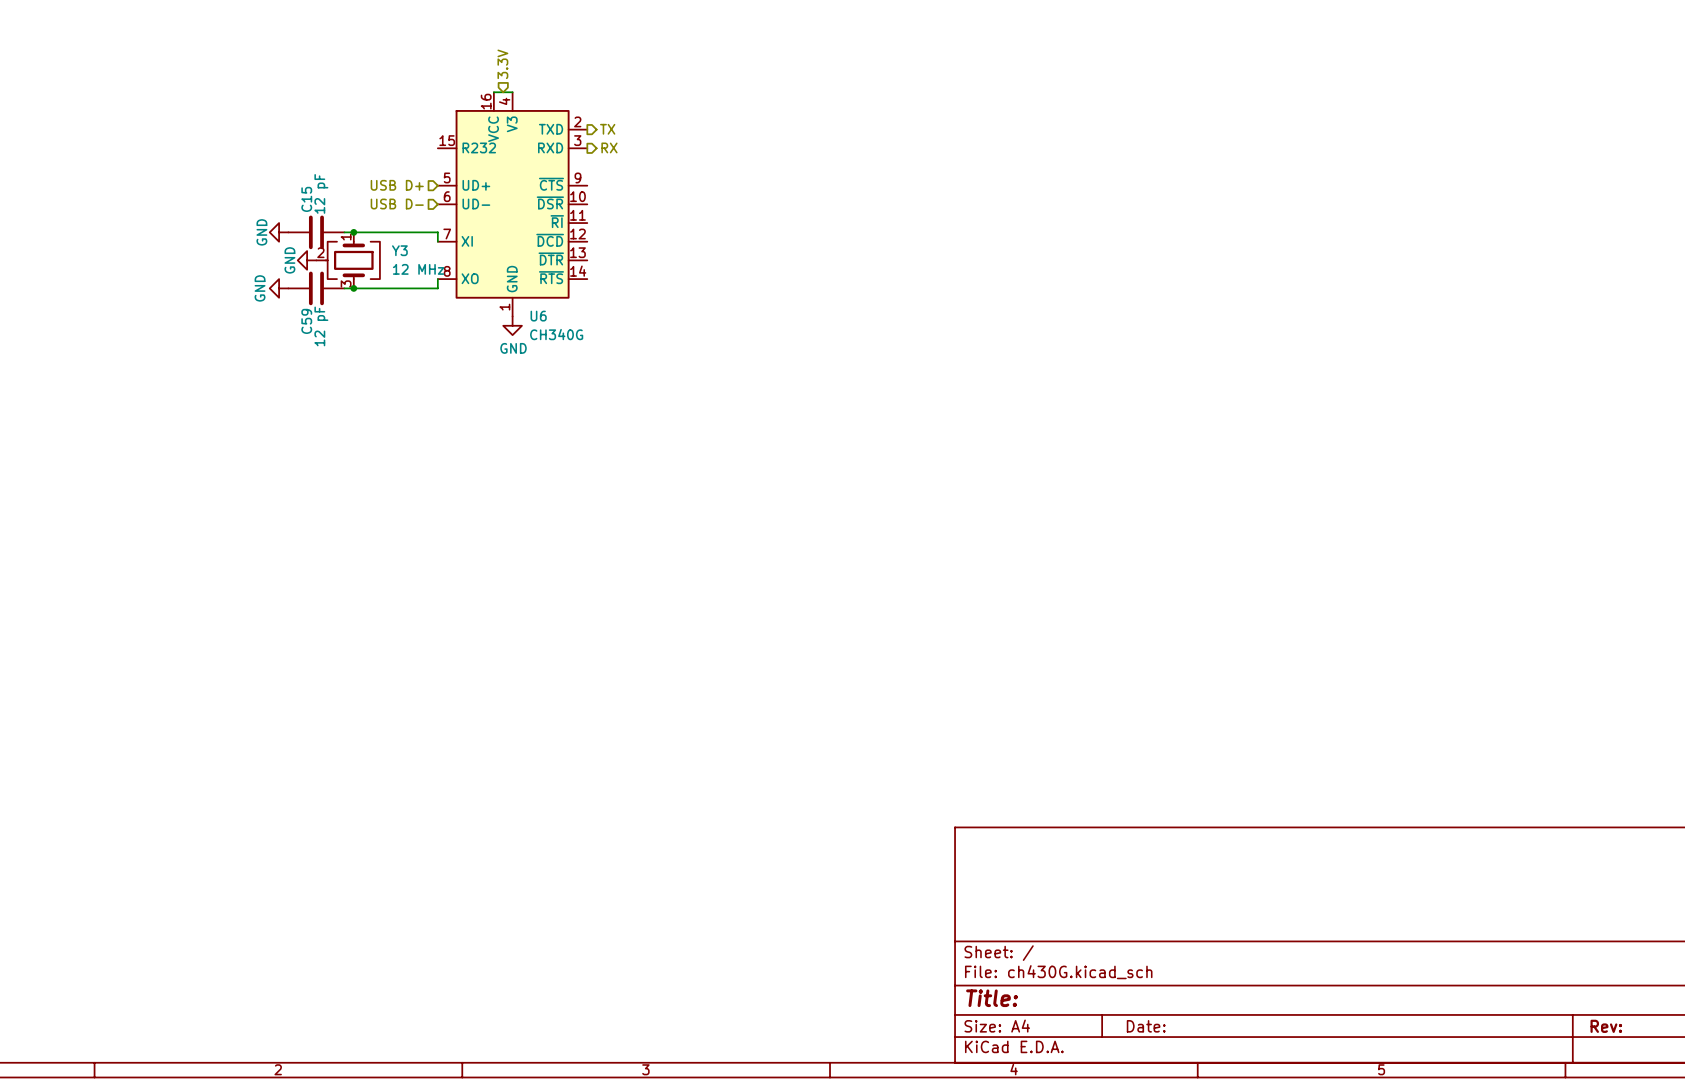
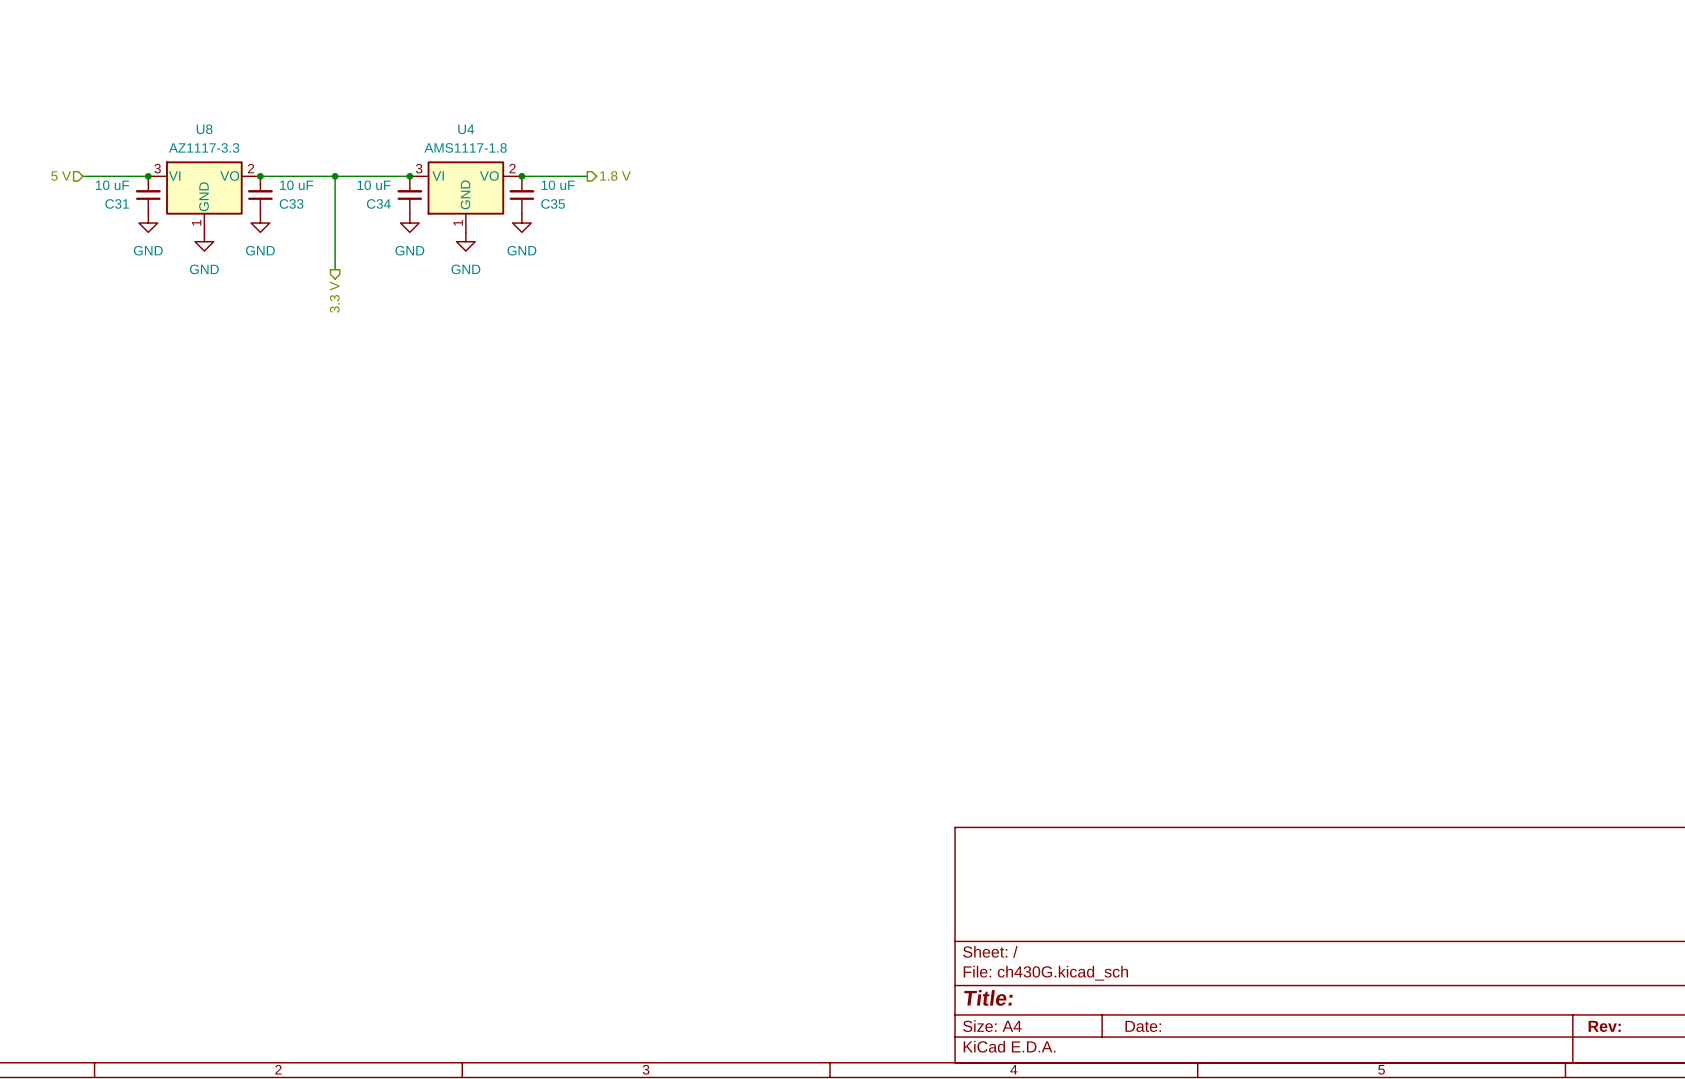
hierarchical label: 3.3V (502, 64) -> none
wire: (493, 92) (512, 92) -> none
hierarchical label: TX (607, 129) -> none
hierarchical label: RX (609, 147) -> none
hierarchical label: none -> 5 V (61, 176)
hierarchical label: none -> 1.8 V (615, 175)
wire: none -> (82, 176) (148, 176)
junction: none -> (148, 176)
wire: none -> (260, 176) (409, 176)
junction: none -> (260, 176)
wire: none -> (335, 176) (335, 269)
junction: none -> (335, 176)
junction: none -> (409, 176)
junction: none -> (521, 176)
hierarchical label: USB D+ (397, 185) -> none
C31: none -> 10 uF (148, 195)
C33: none -> 10 uF (260, 195)
C34: none -> 10 uF (409, 195)
C35: none -> 10 uF (521, 195)
U8: none -> AZ1117-3.3 (204, 196)
U4: none -> AMS1117-1.8 (465, 196)
hierarchical label: USB D- (397, 204) -> none
U6: CH340G (512, 204) -> none
power symbol: none -> GND (148, 223)
power symbol: none -> GND (409, 223)
power symbol: none -> GND (521, 223)
power symbol rotation: 0° (279, 232) -> 90° counterclockwise (260, 223)
power symbol position: GND (279, 232) -> GND (260, 223)
C15: 12 pF (316, 232) -> none
wire: (344, 232) (437, 232) (437, 241) -> none
junction: (353, 232) -> none
power symbol: none -> GND (204, 241)
power symbol: none -> GND (465, 241)
power symbol: GND (307, 260) -> none
Y3: 12 MHz (348, 260) -> none
wire: (437, 279) (437, 288) (344, 288) -> none
power symbol: GND (279, 288) -> none
C59: 12 pF (316, 288) -> none
junction: (353, 288) -> none
hierarchical label: none -> 3.3 V (334, 297)
power symbol: GND (512, 325) -> none

